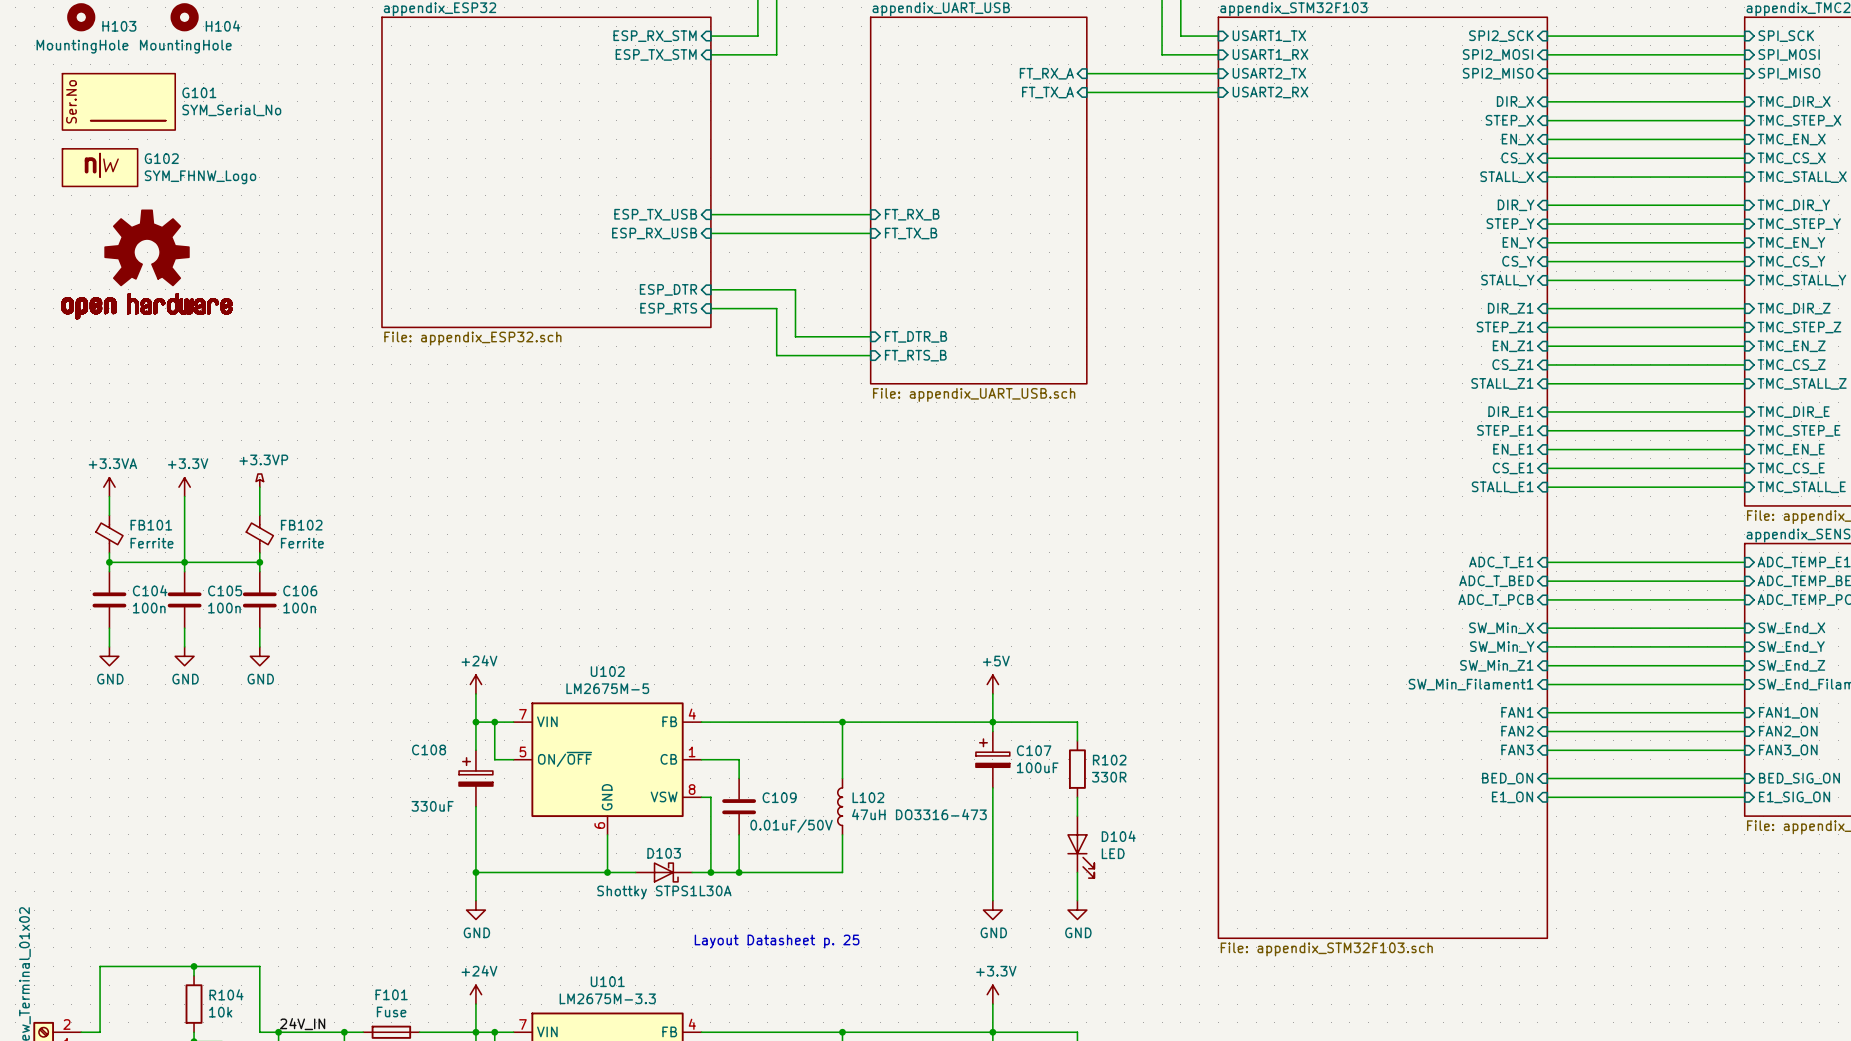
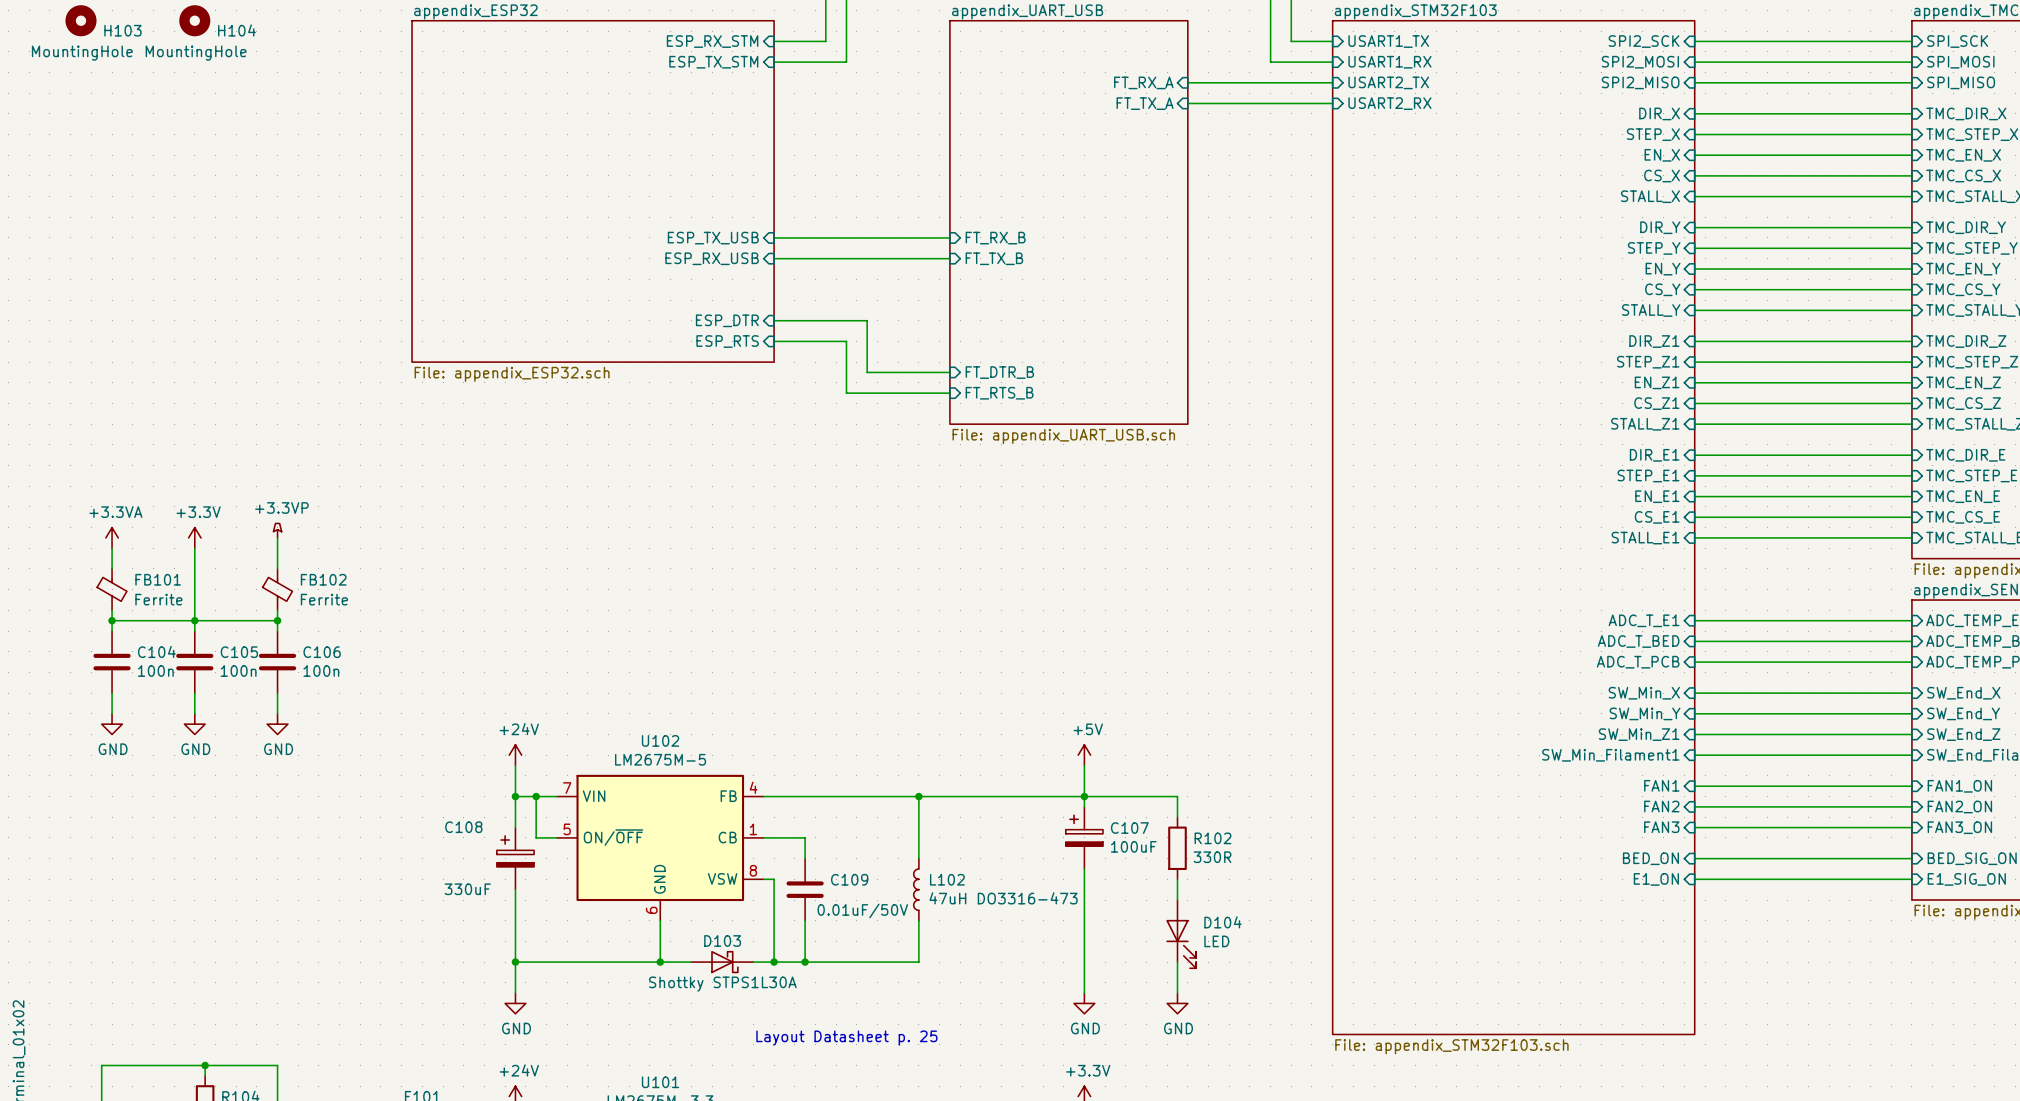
G101: SYM_Serial_No (118, 101) -> none
G102: SYM_FHNW_Logo (100, 167) -> none
part: (146, 264) -> none

